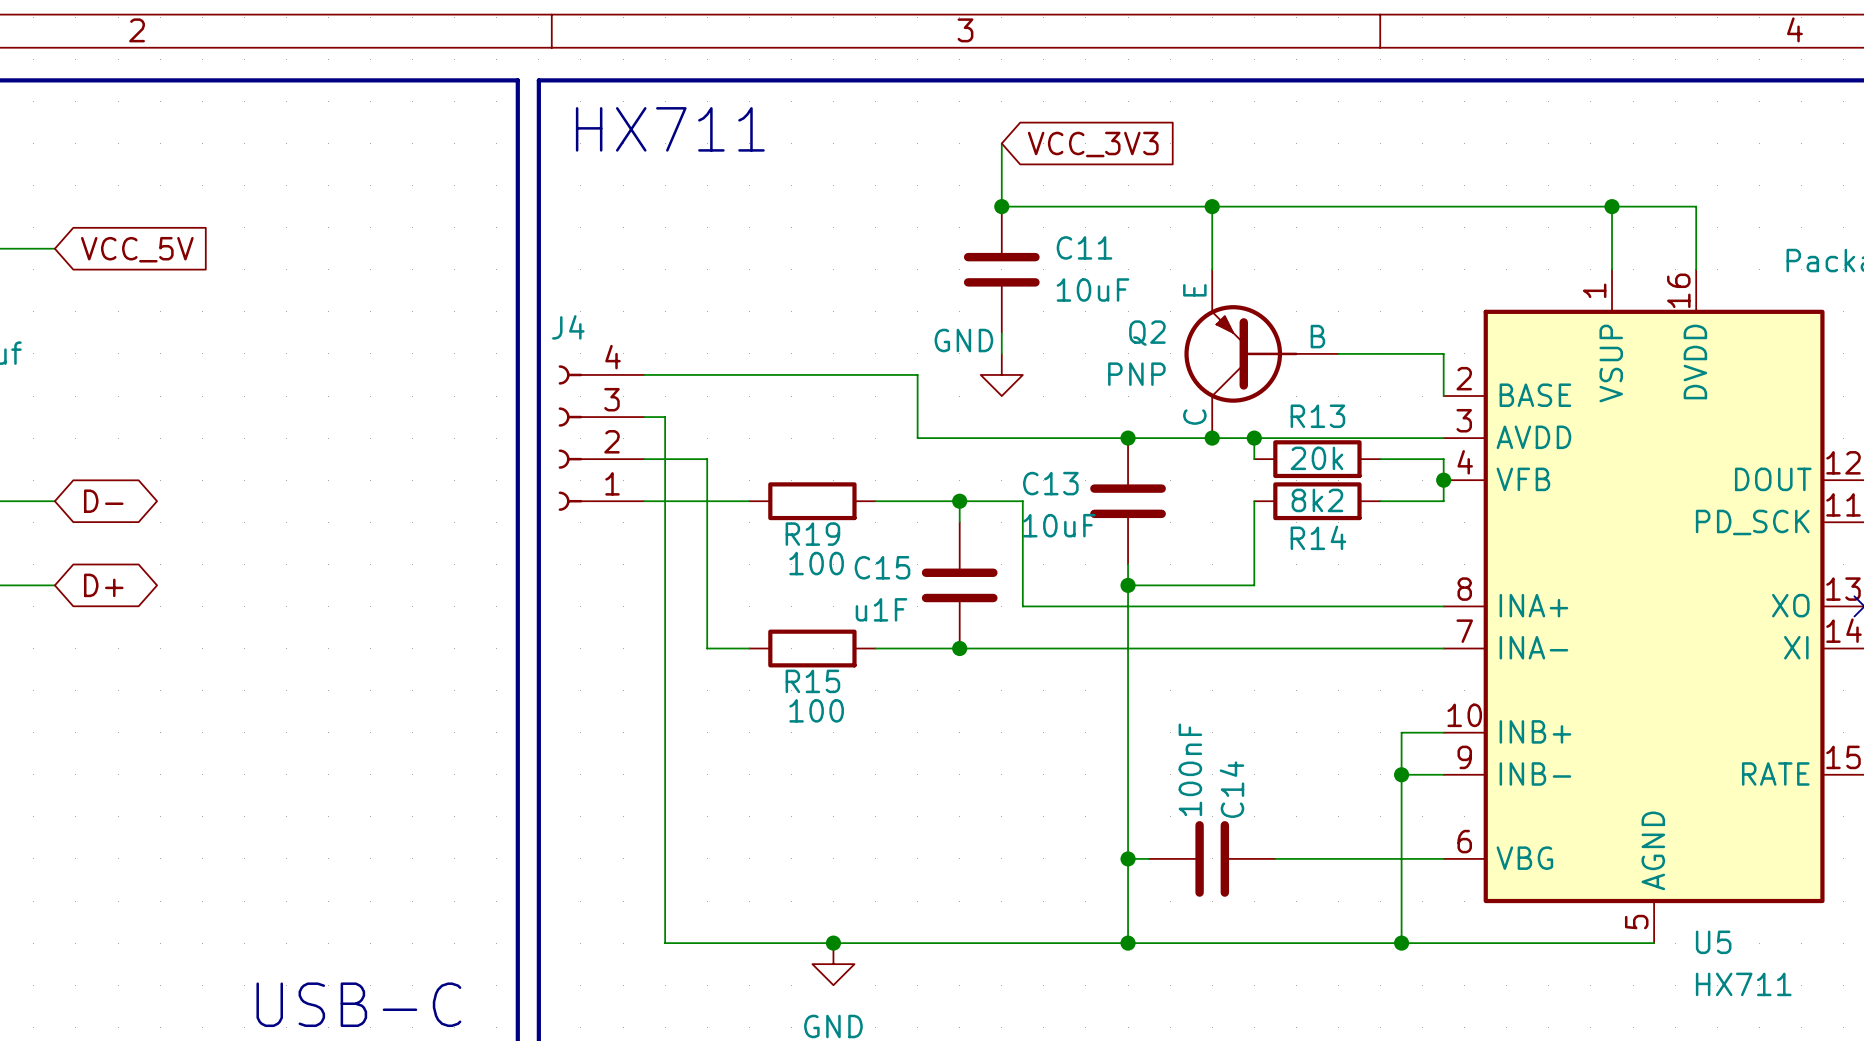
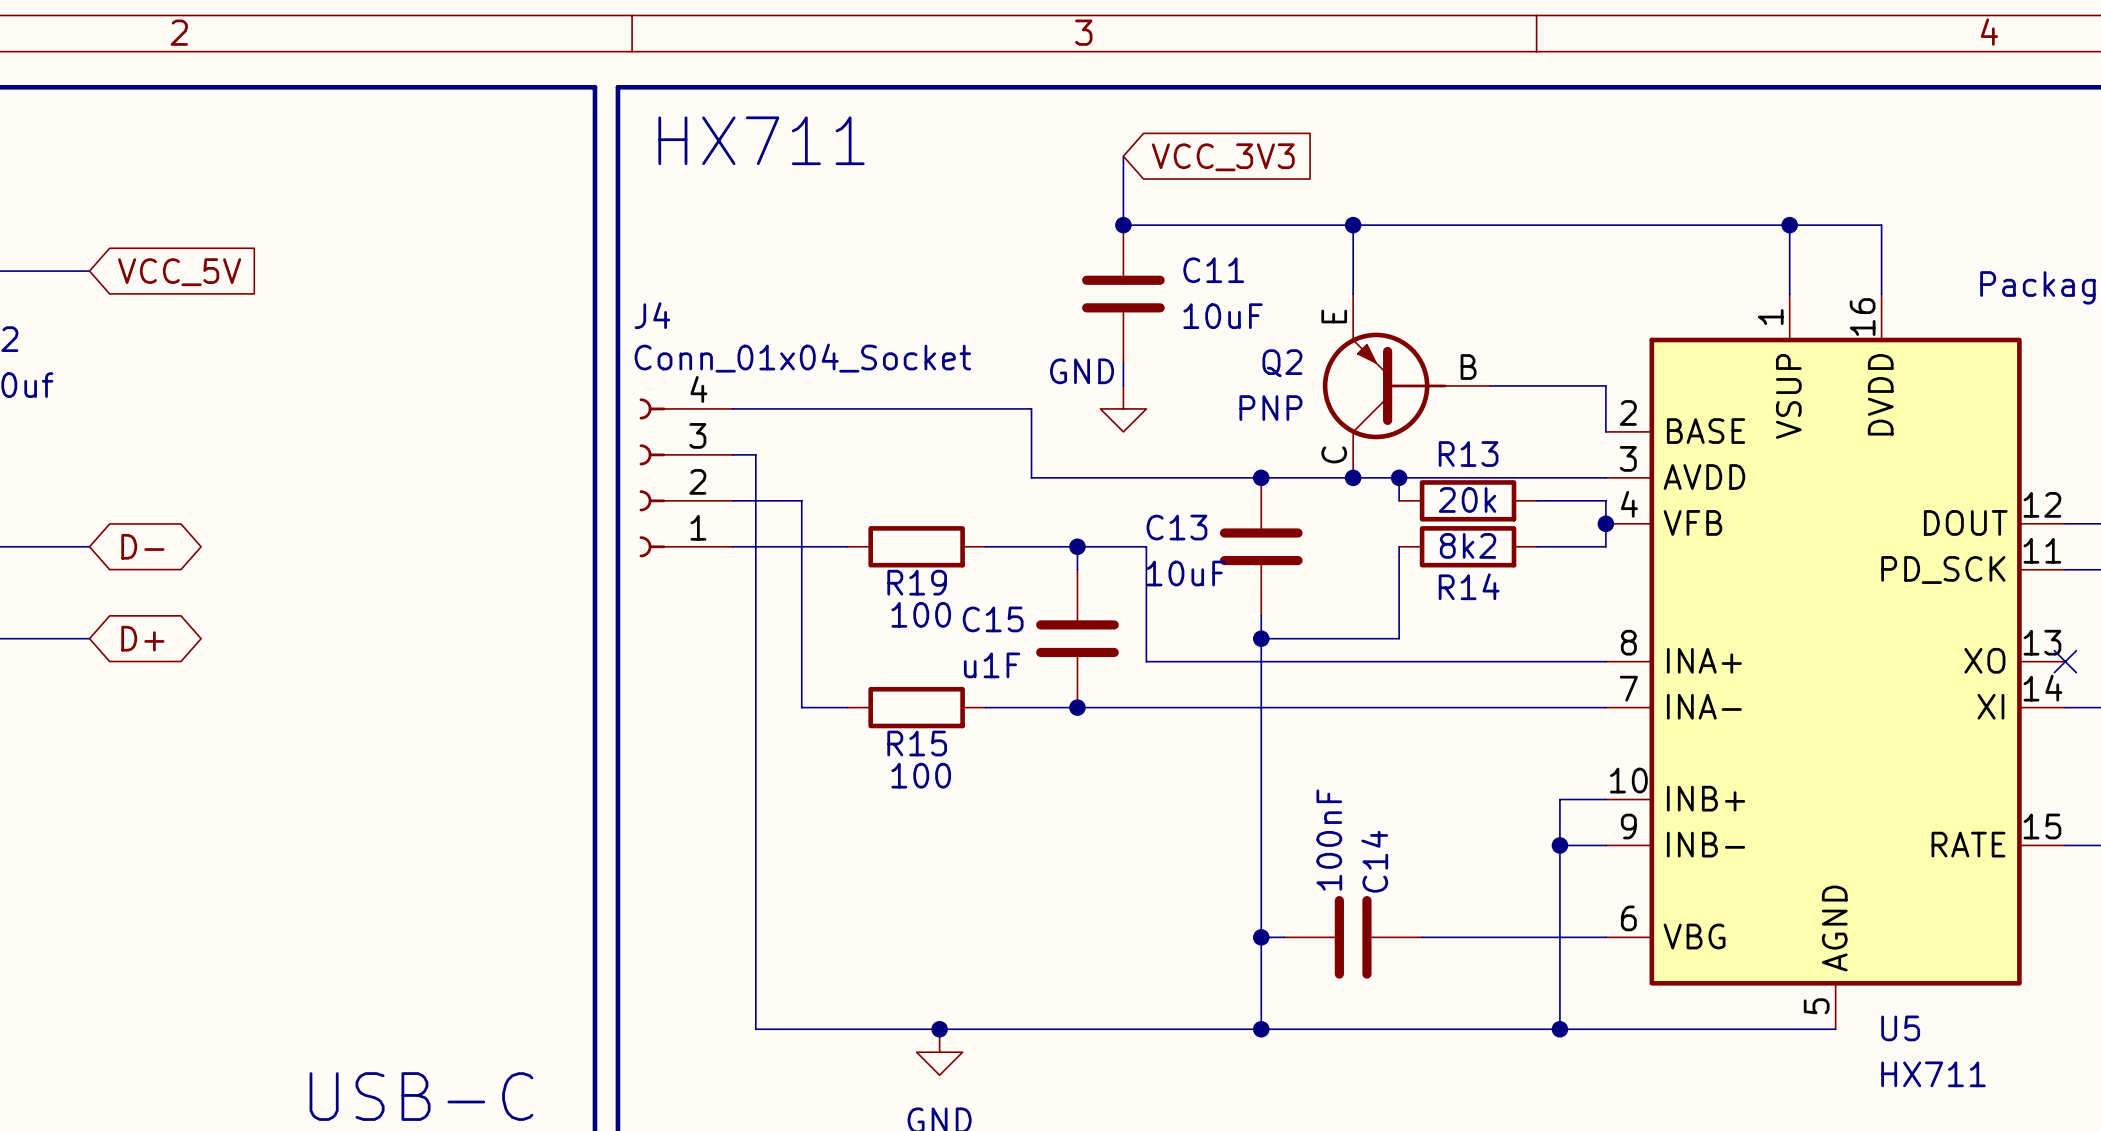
J4 name position: J4 (568, 327) -> J4 (652, 315)
J4 value: none -> Conn_01x04_Socket (802, 358)

